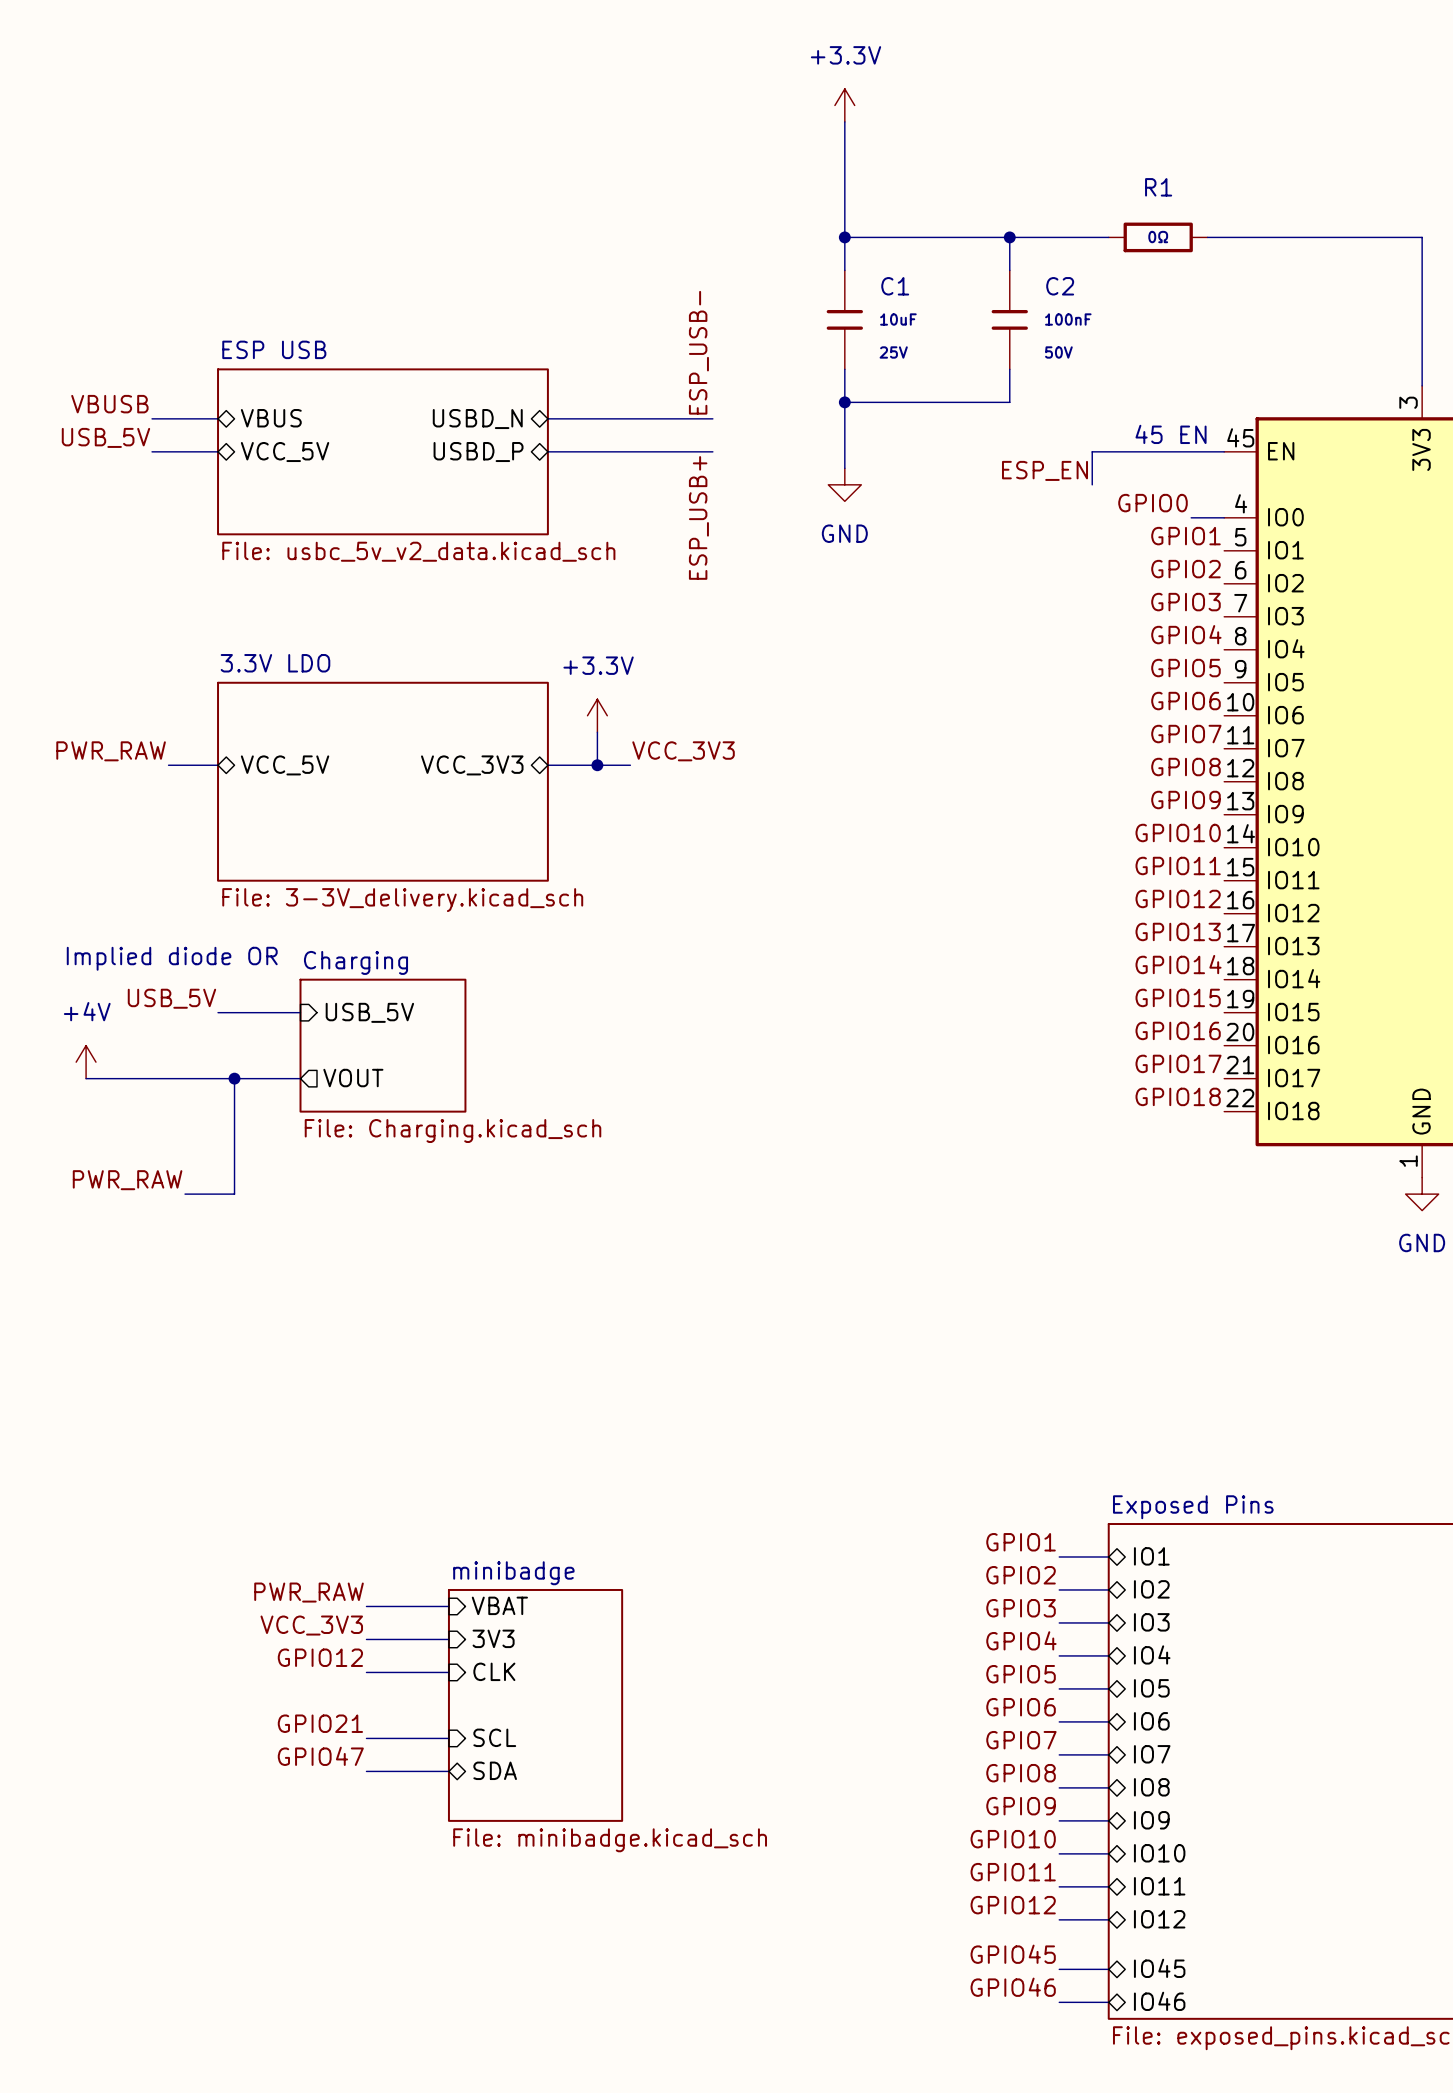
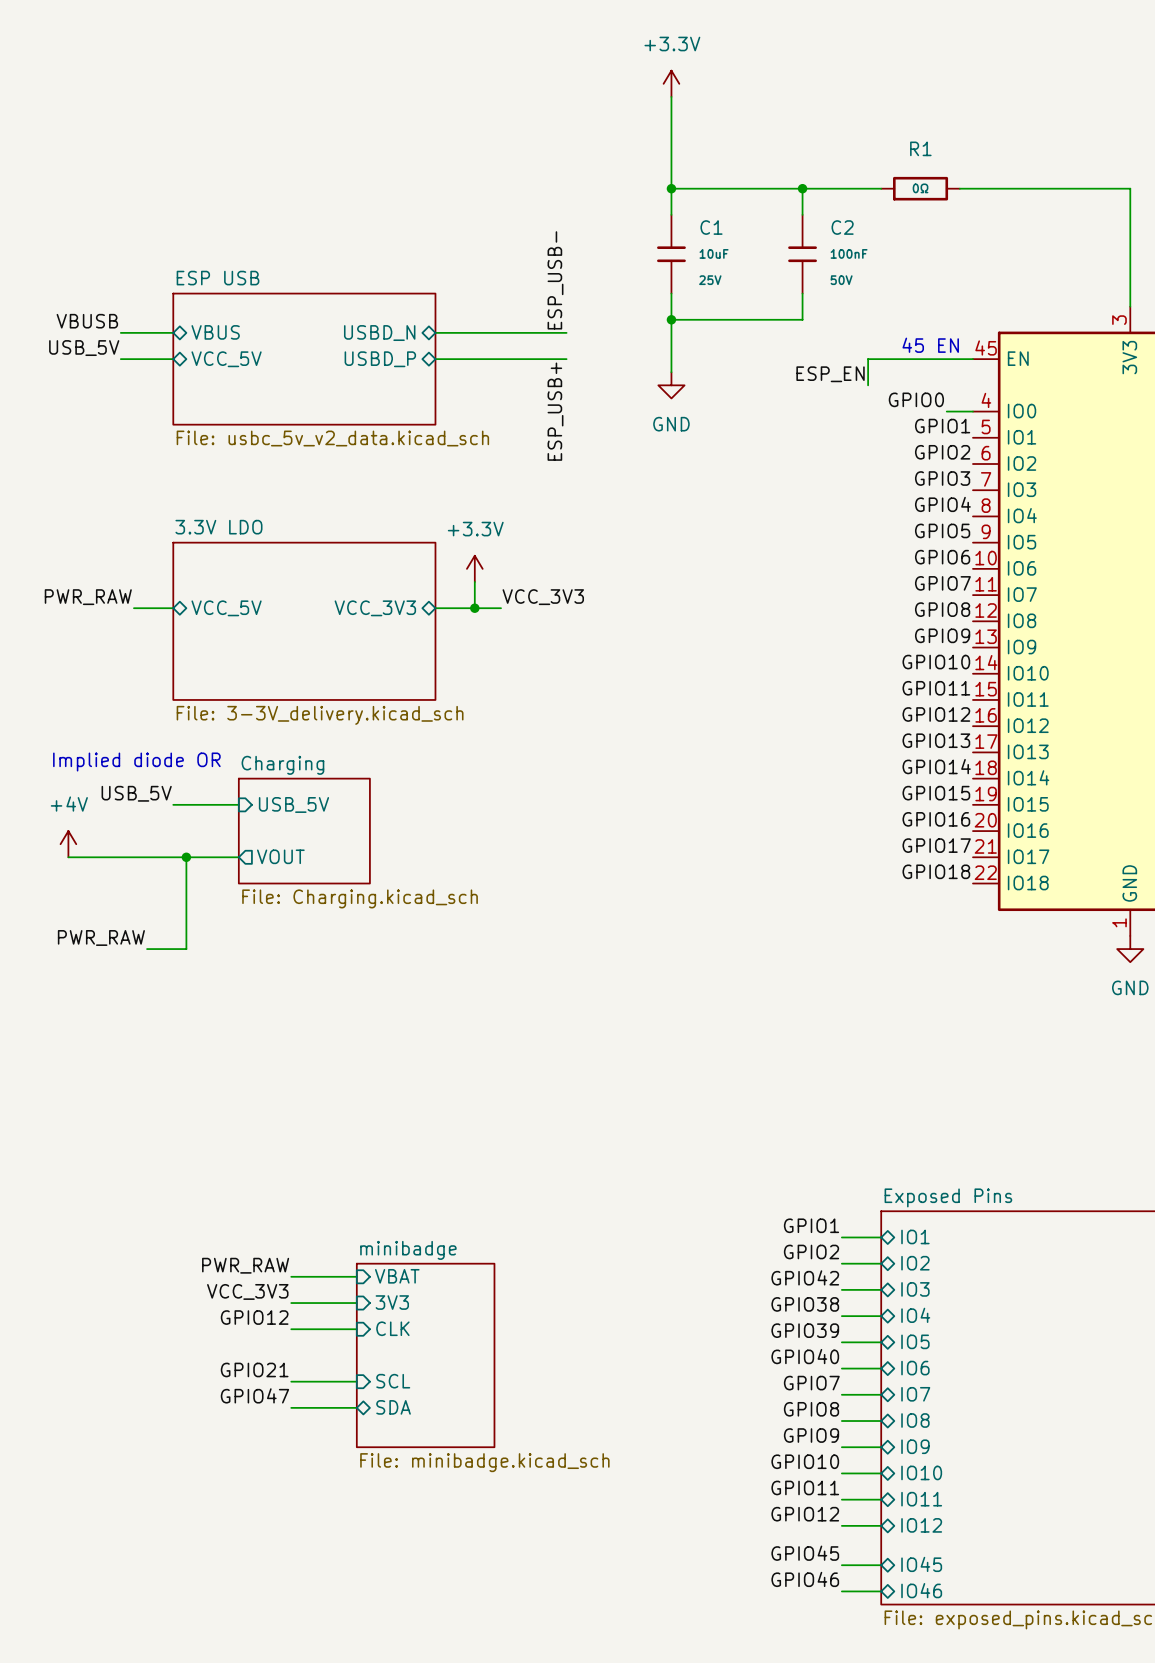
label: GPIO3 (1021, 1608) -> GPIO42 (805, 1277)
label: GPIO4 (1021, 1640) -> GPIO38 (805, 1304)
label: GPIO5 (1021, 1674) -> GPIO39 (805, 1330)
label: GPIO6 (1021, 1707) -> GPIO40 (805, 1356)

